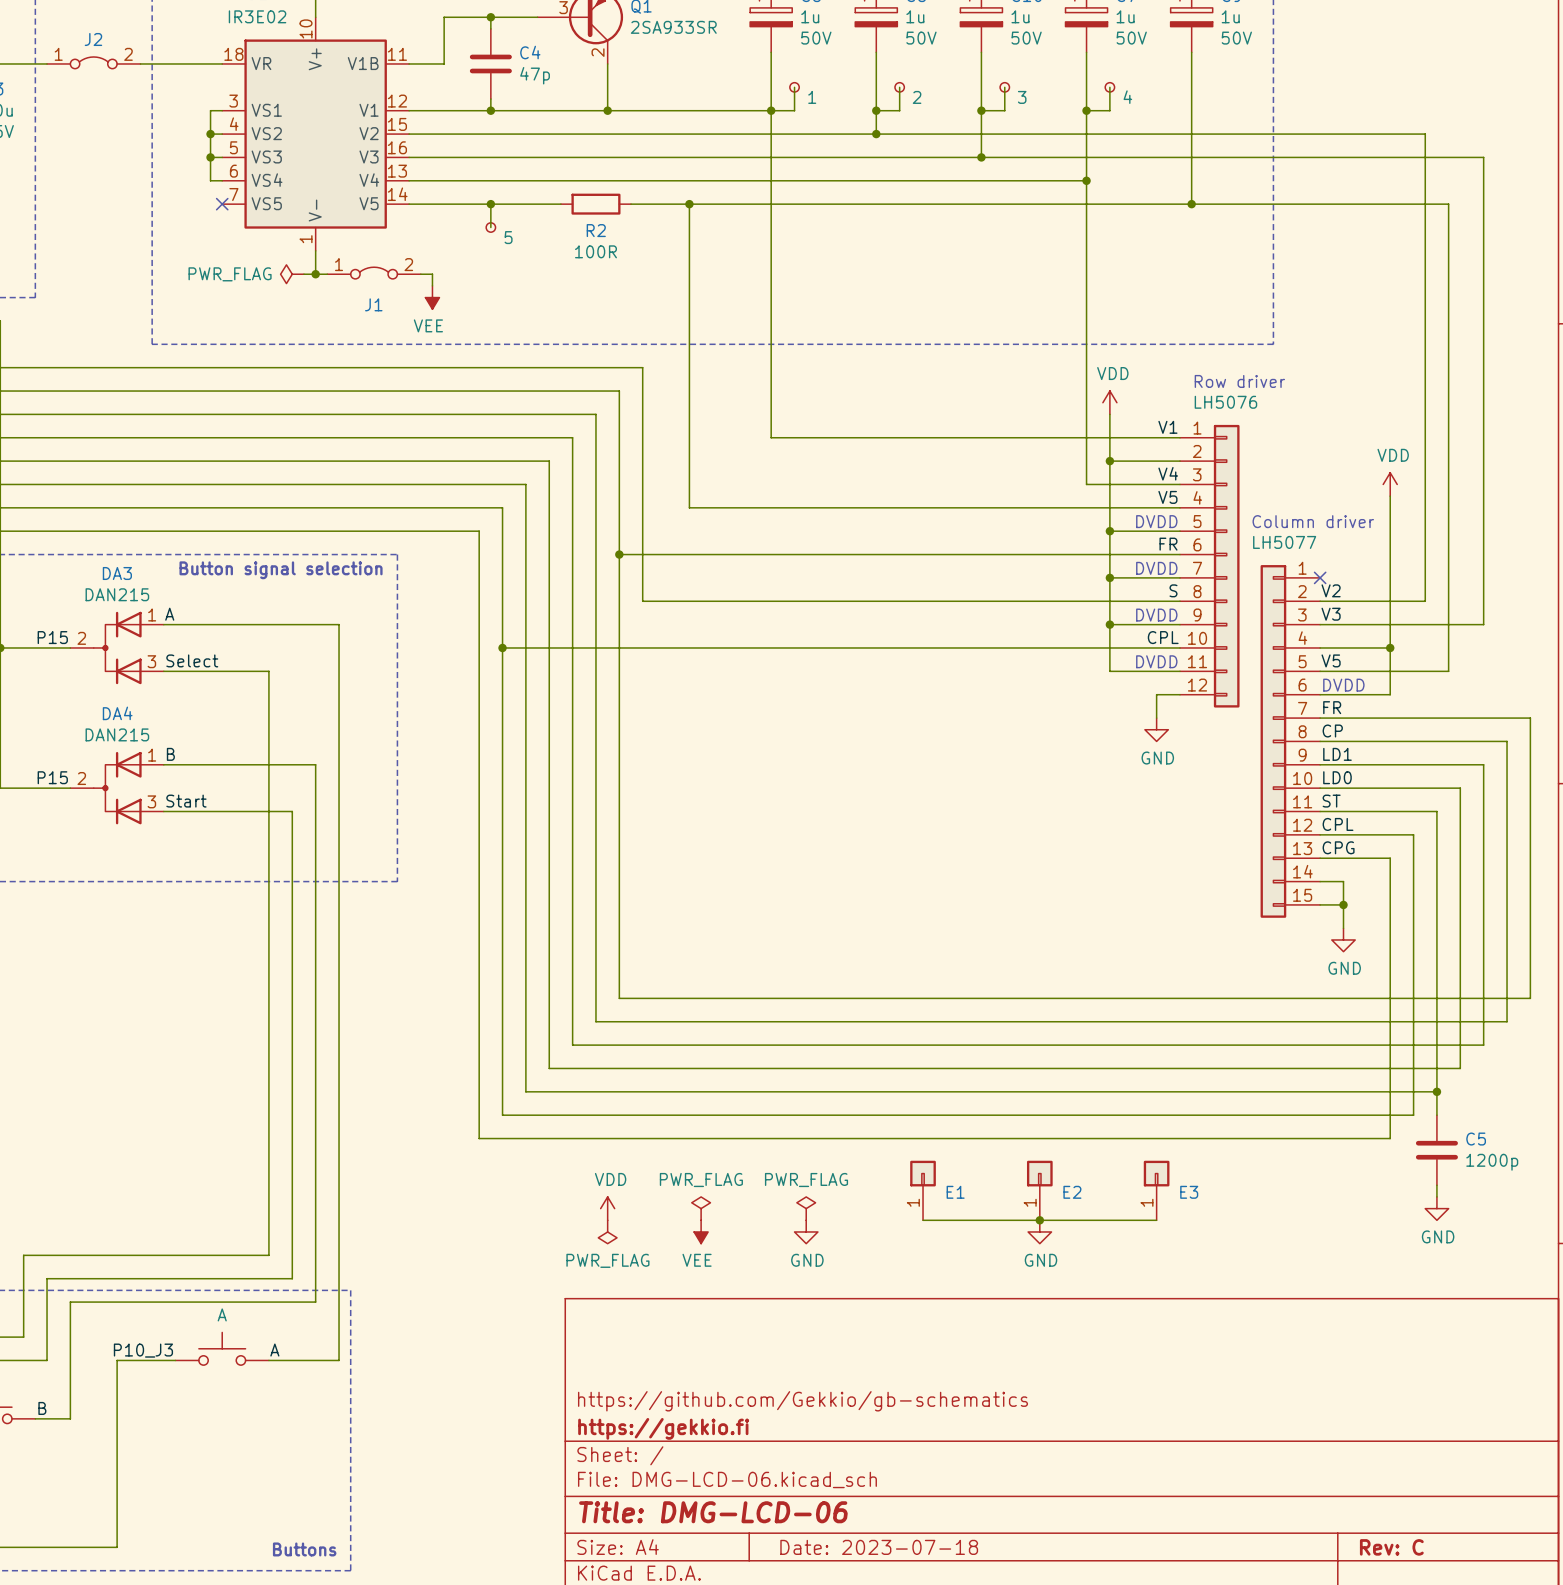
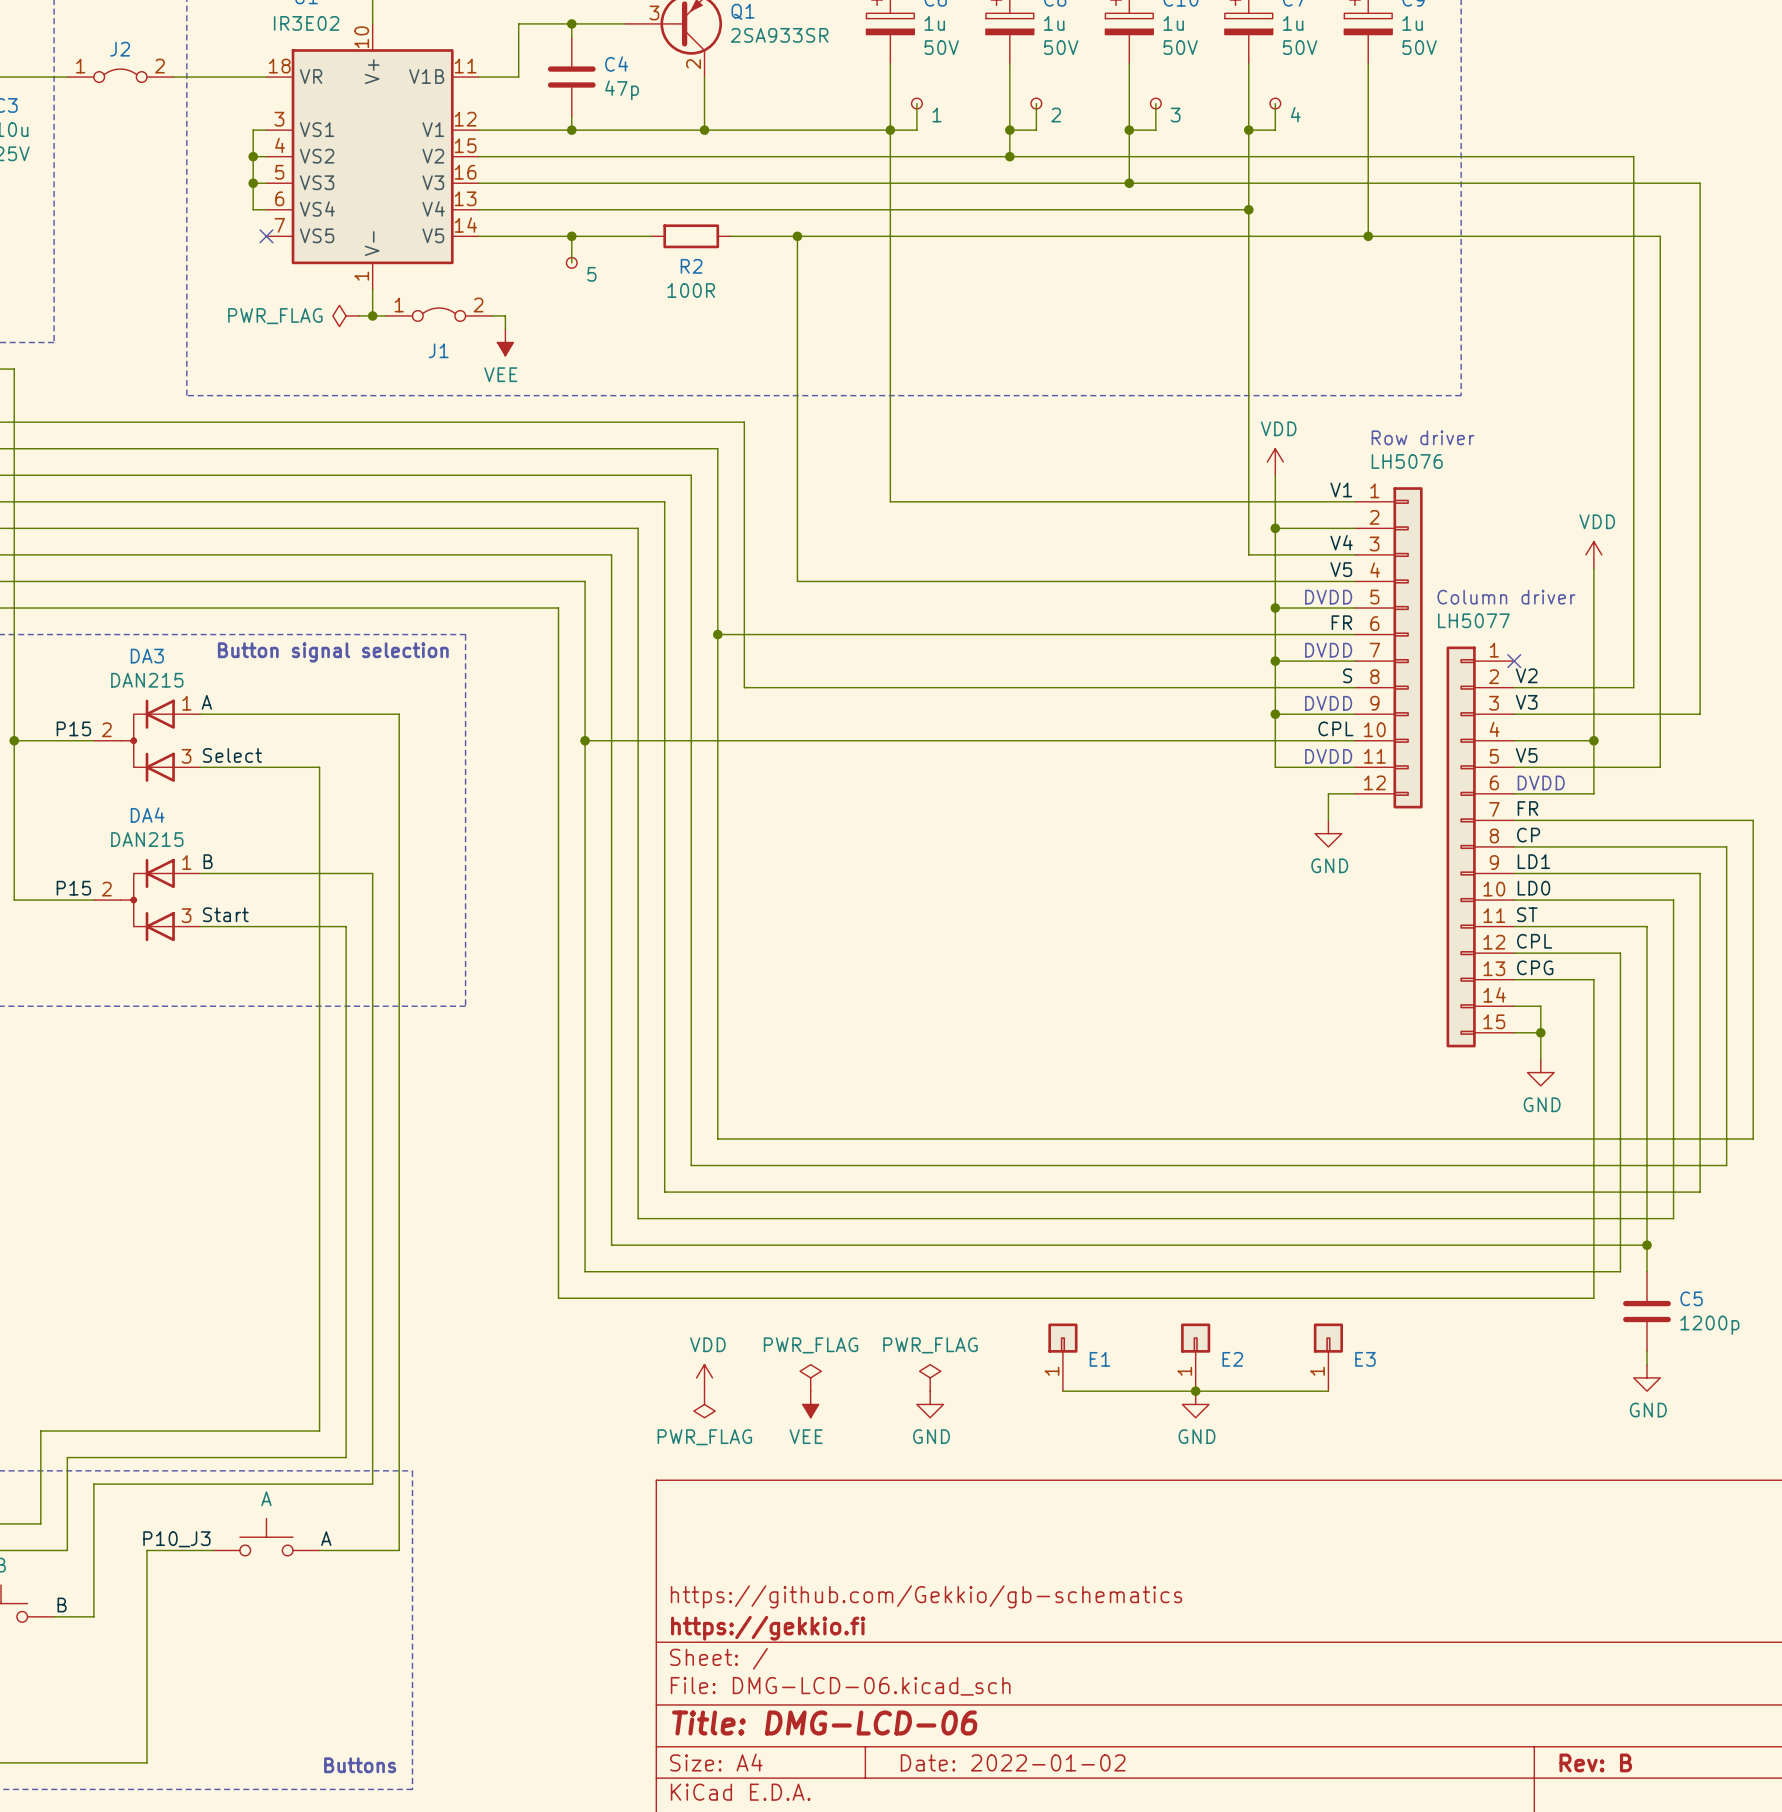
title block: Date: 2023-07-18 (879, 1547) -> Date: 2022-01-02 (1013, 1762)
title block: Rev: C (1391, 1547) -> Rev: B (1595, 1762)

